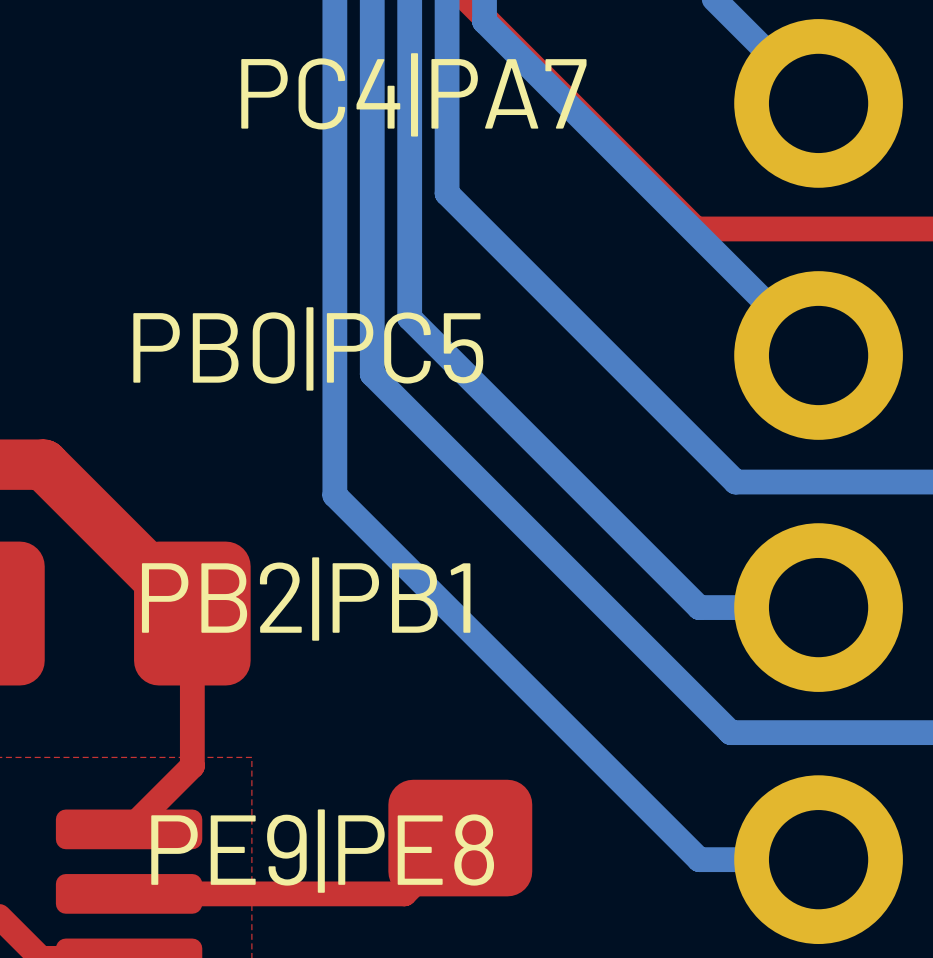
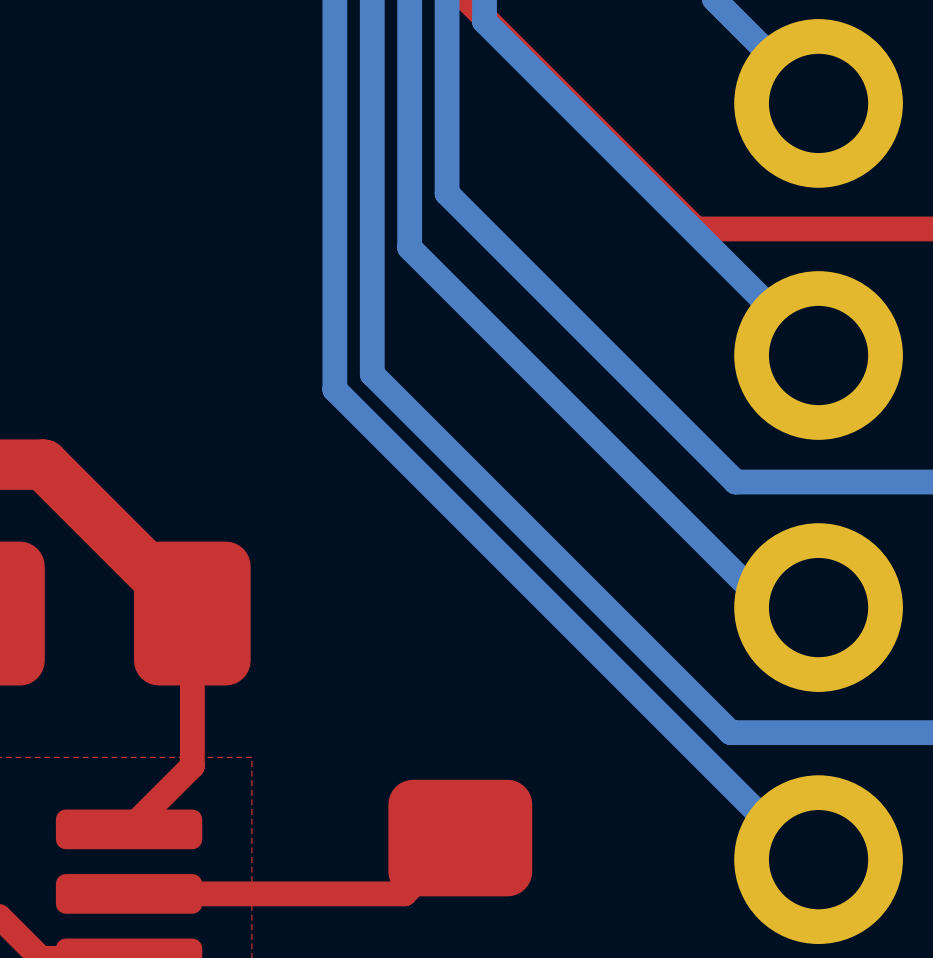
text: PC4|PA7 (413, 94) -> none
bottom track: (409, 247) (409, 317) (699, 607) (769, 607) -> (409, 247) (769, 607)
text: PB0|PC5 (308, 348) -> none
bottom track: (334, 389) (334, 495) (699, 859) (804, 859) -> (334, 389) (804, 859)
text: PB2|PB1 (306, 599) -> none
text: PE9|PE8 (322, 851) -> none

